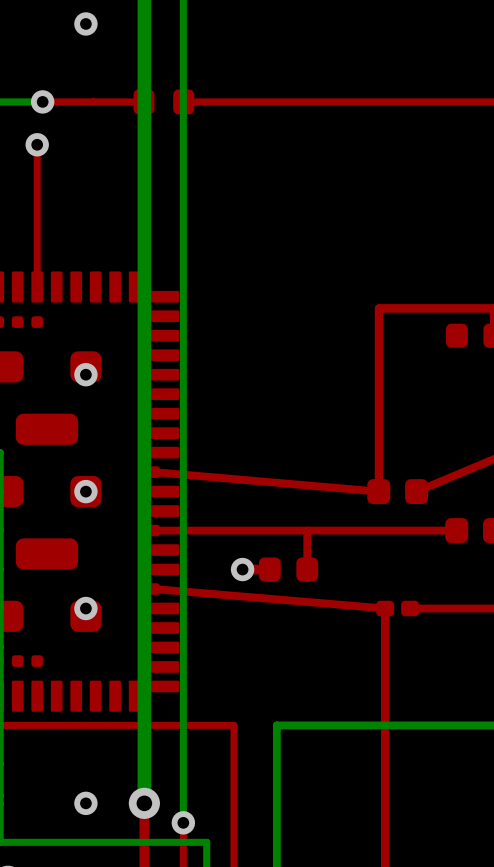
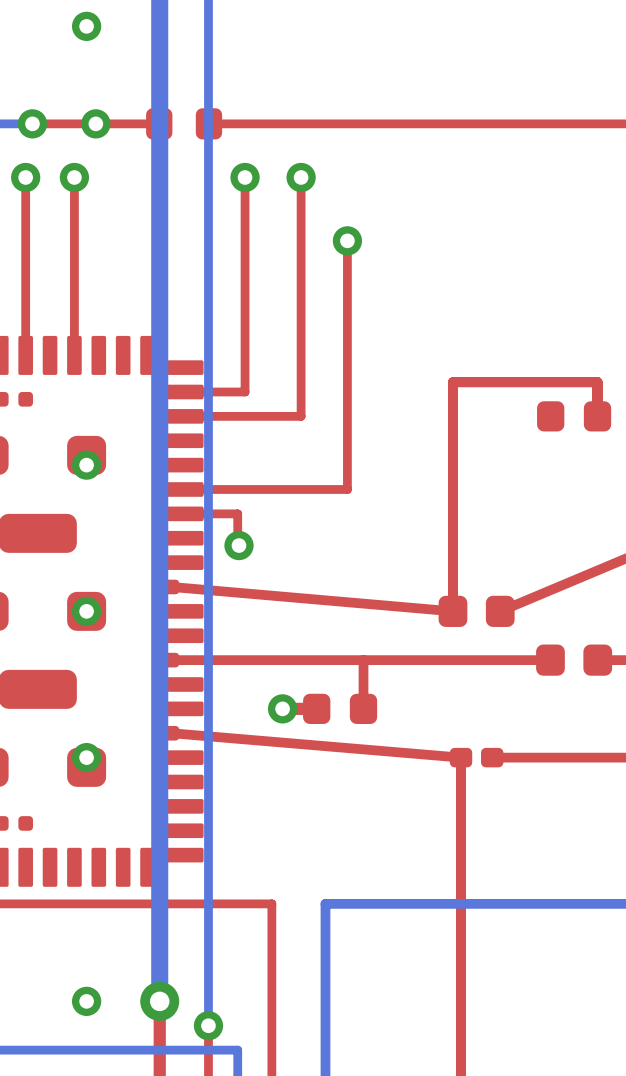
via: none -> (95, 123)
top track: none -> (74, 177) (74, 355)
via: none -> (74, 177)
top track: none -> (245, 177) (245, 391) (184, 391)
via: none -> (245, 177)
top track: none -> (301, 177) (301, 416) (184, 416)
via: none -> (301, 177)
top track: none -> (347, 240) (347, 489) (184, 489)
via: none -> (347, 240)
top track: none -> (184, 513) (237, 513) (237, 545)
via: none -> (238, 545)

